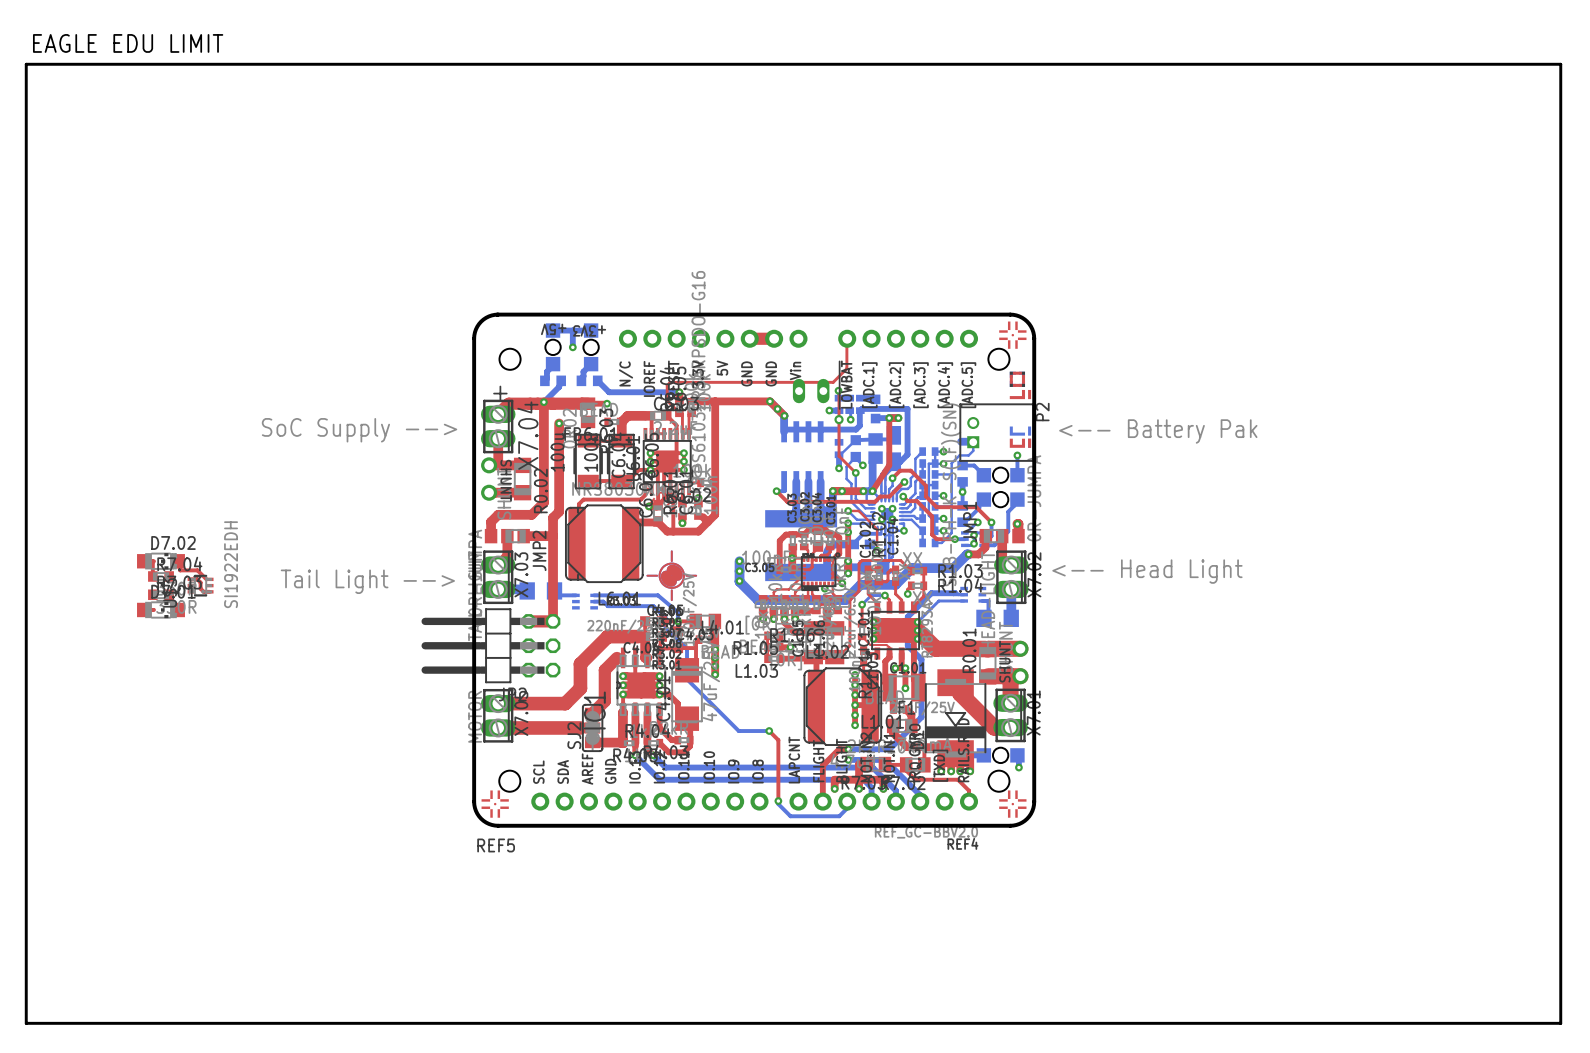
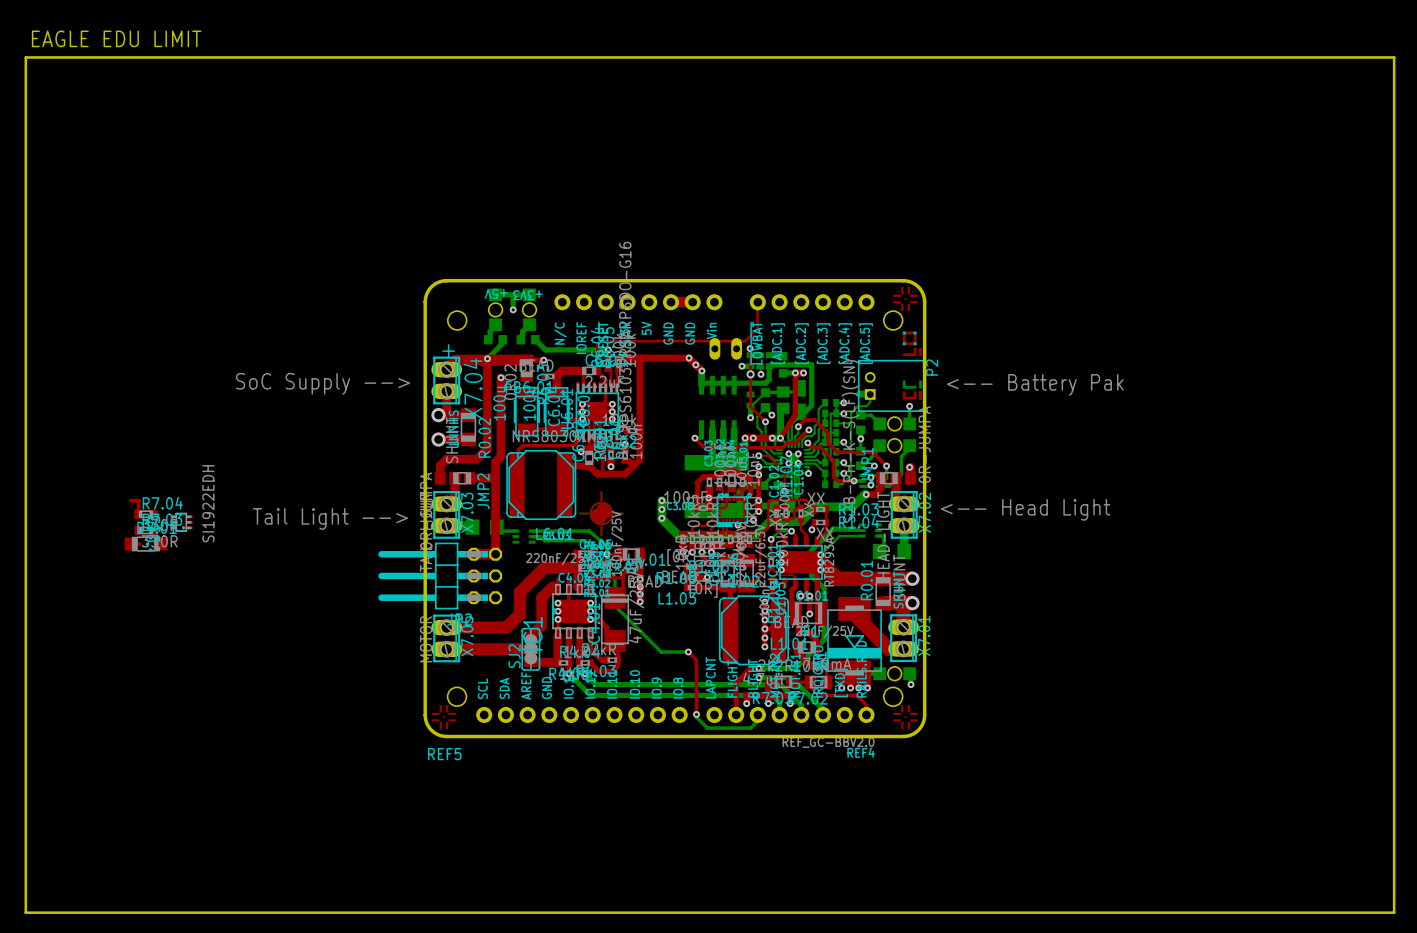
D7.02: (161, 561) -> none
top track: (177, 561) (180, 570) (197, 570) (206, 579) -> none
top track: (191, 579) (197, 579) (200, 582) (200, 588) (203, 591) (209, 591) -> none

